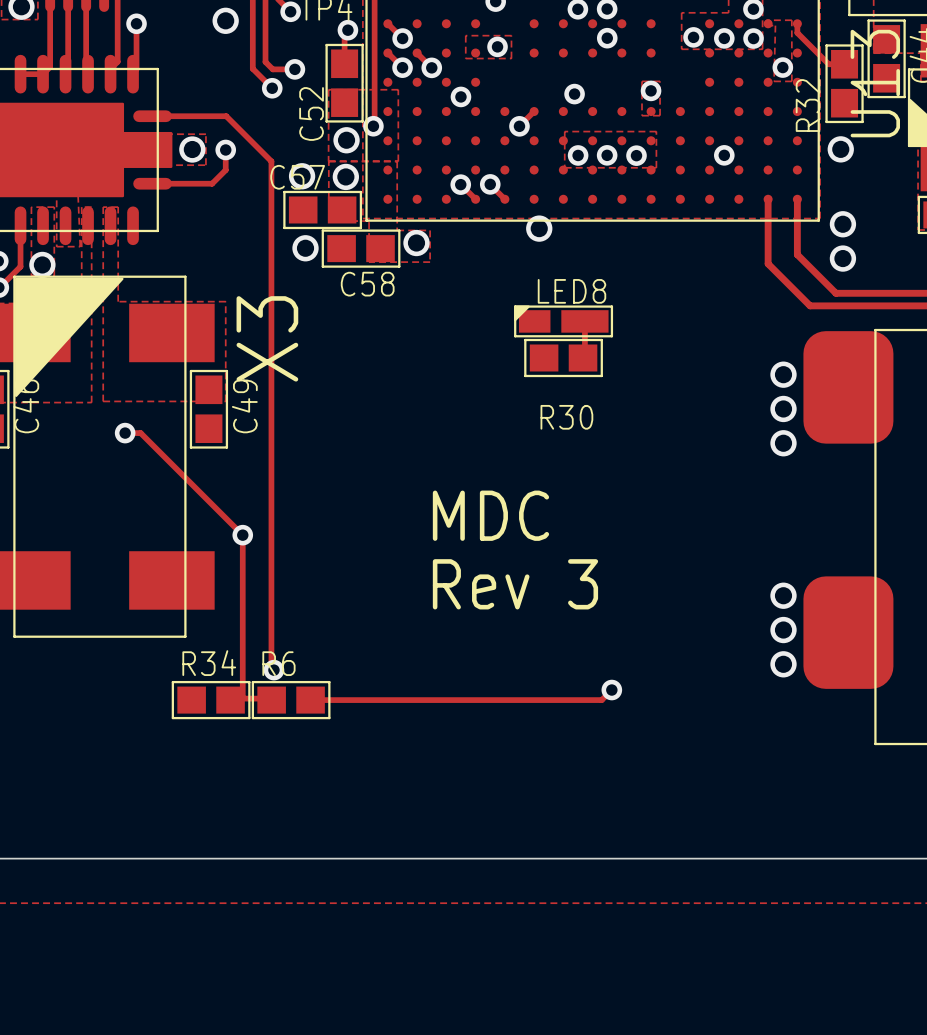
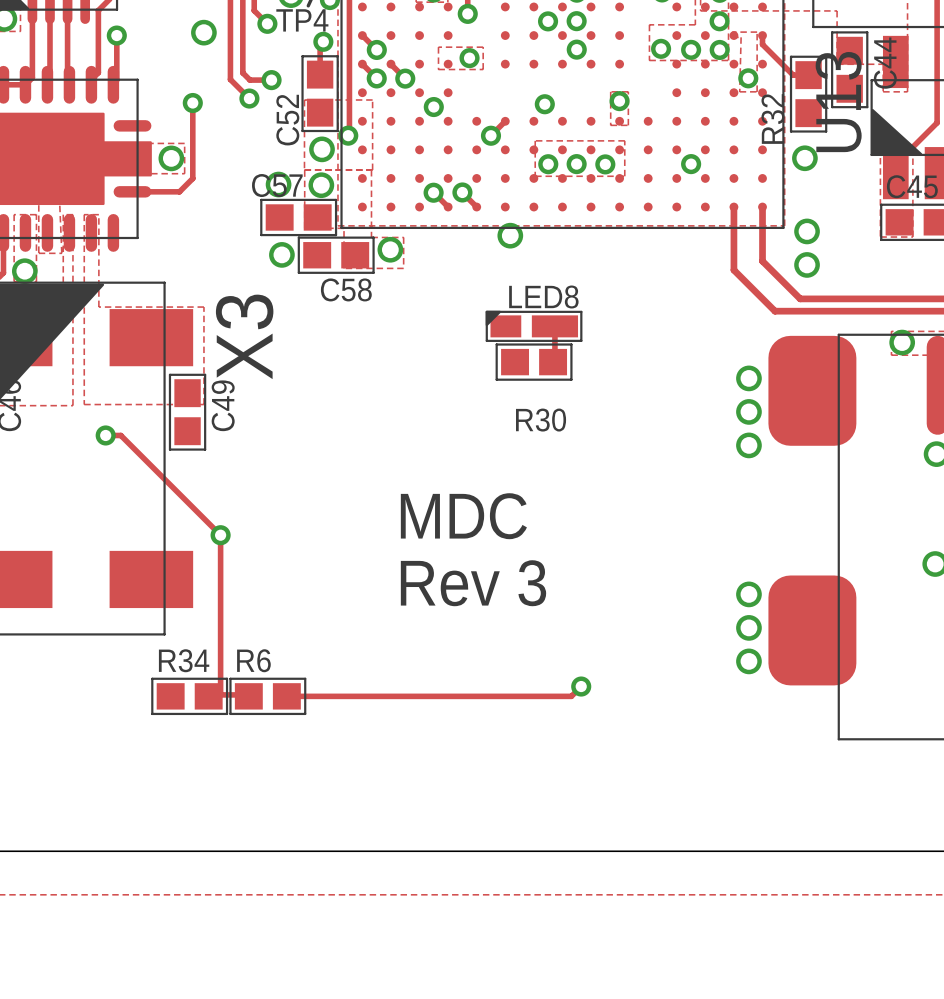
track: (152, 116) (226, 116) (271, 161) (271, 667) (273, 670) -> none
track: (225, 149) (225, 170) (212, 183) (200, 183) -> (192, 103) (192, 178) (179, 191)
via position: (225, 149) -> (192, 103)
via: (273, 670) -> none

